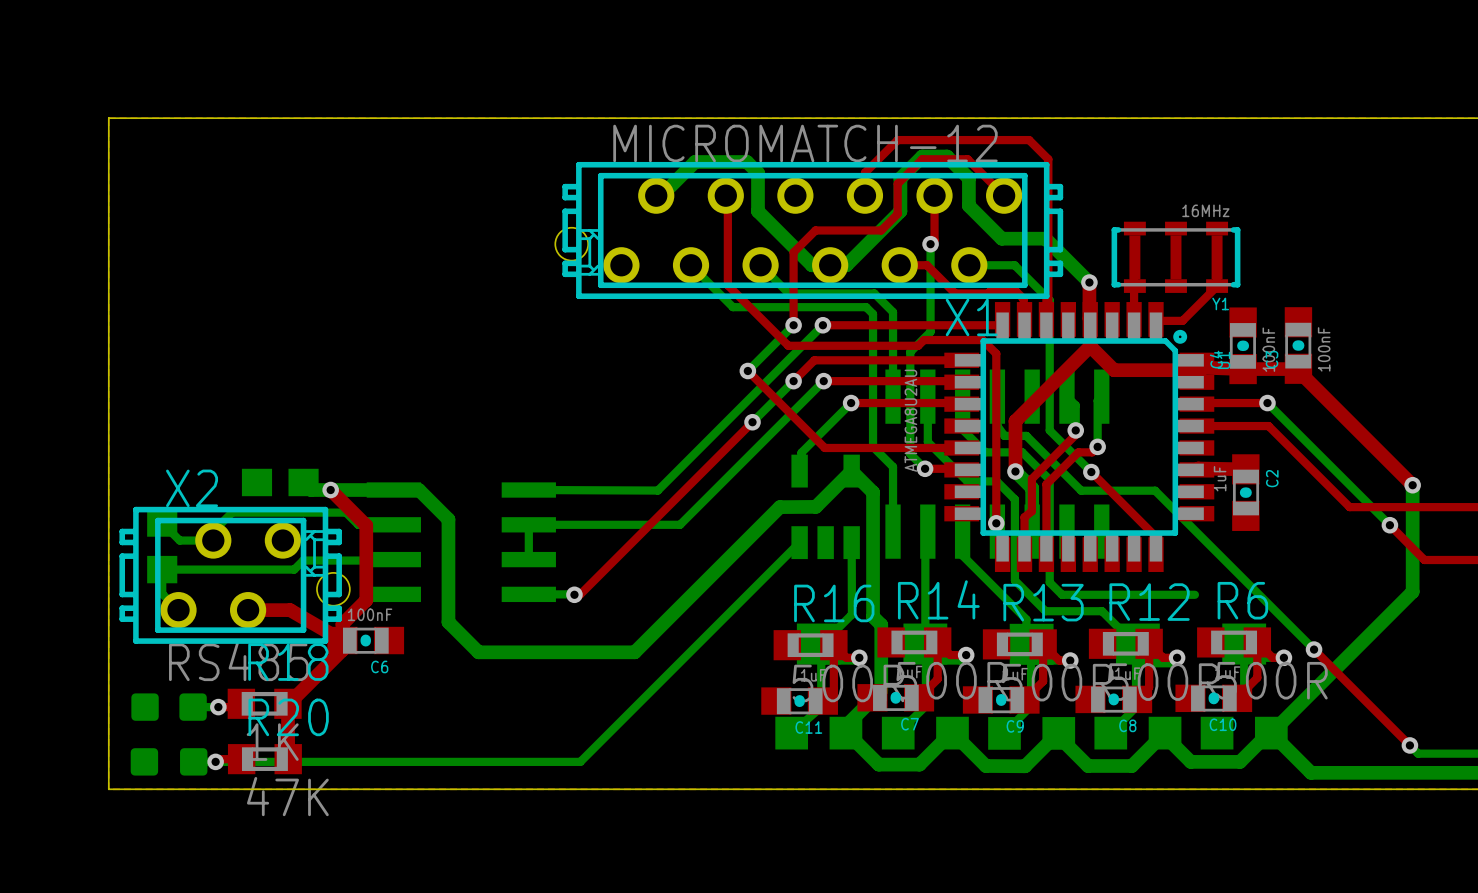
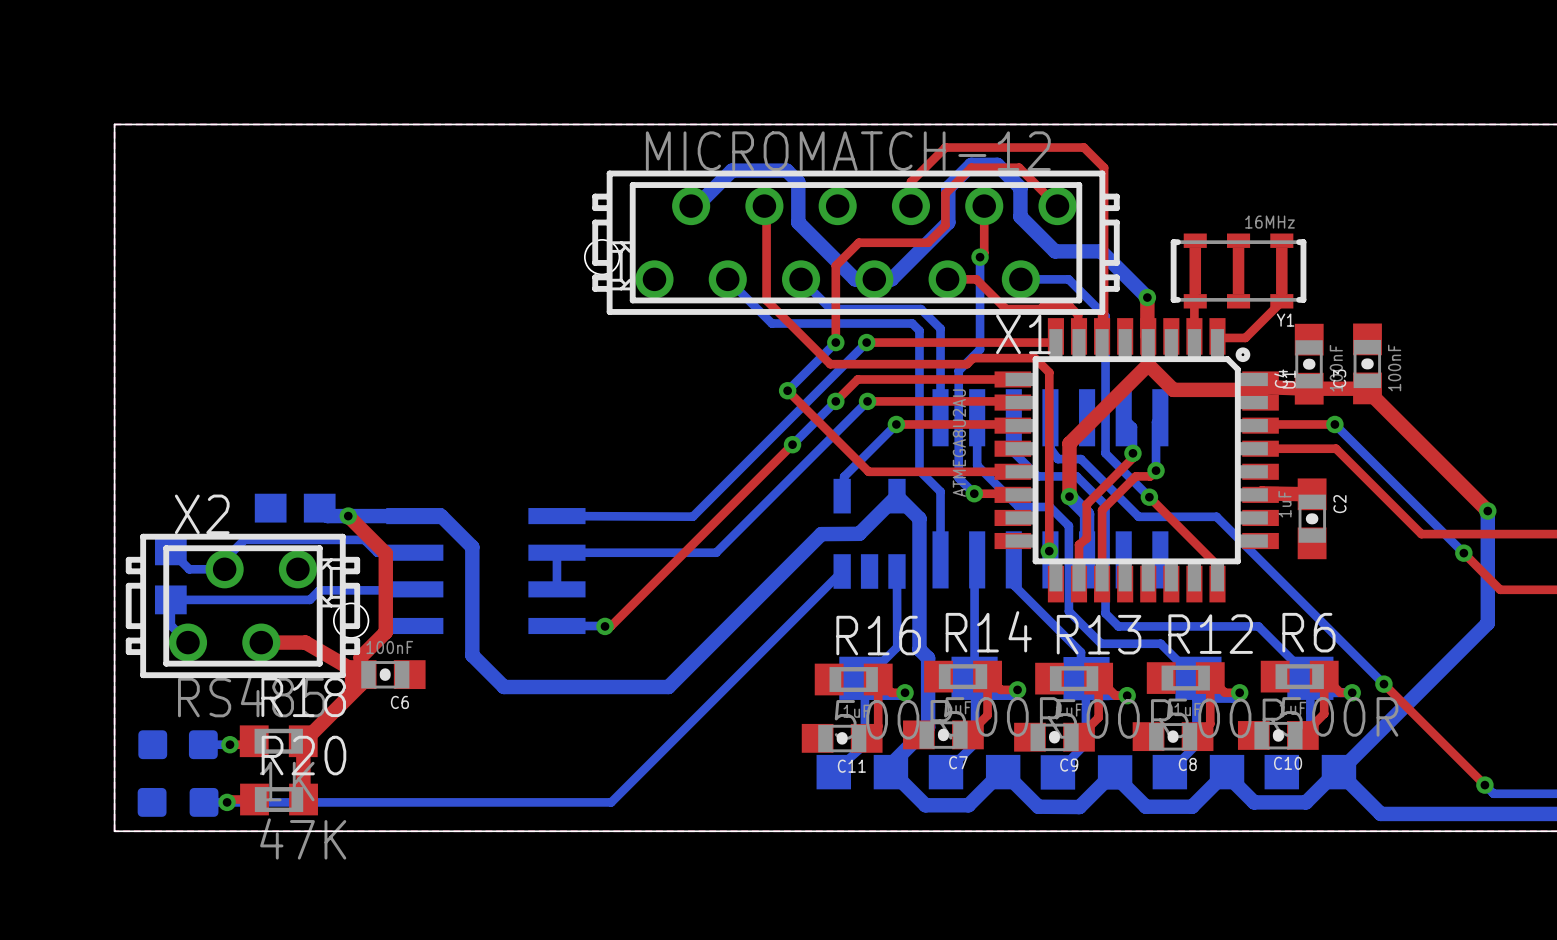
bottom track: none -> (1258, 626) (1324, 692)

